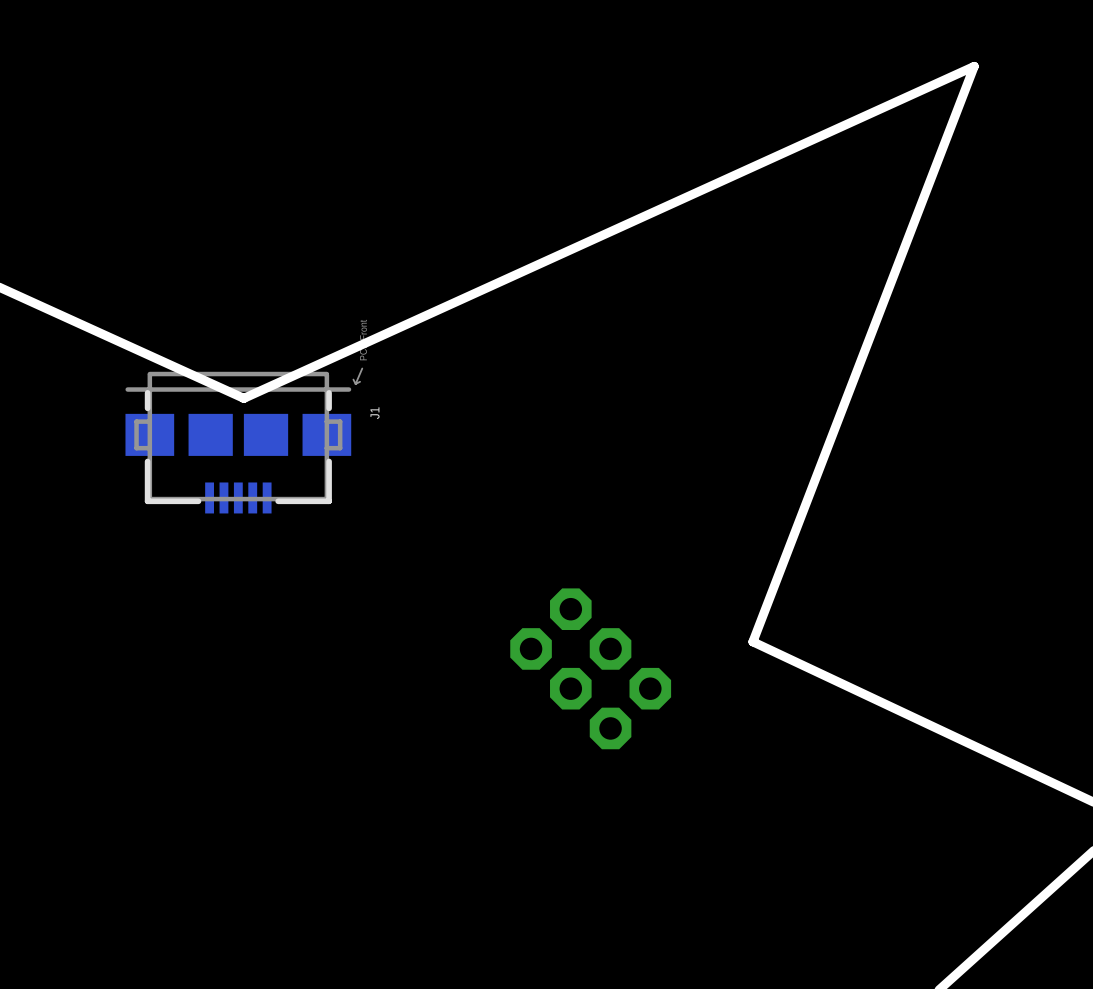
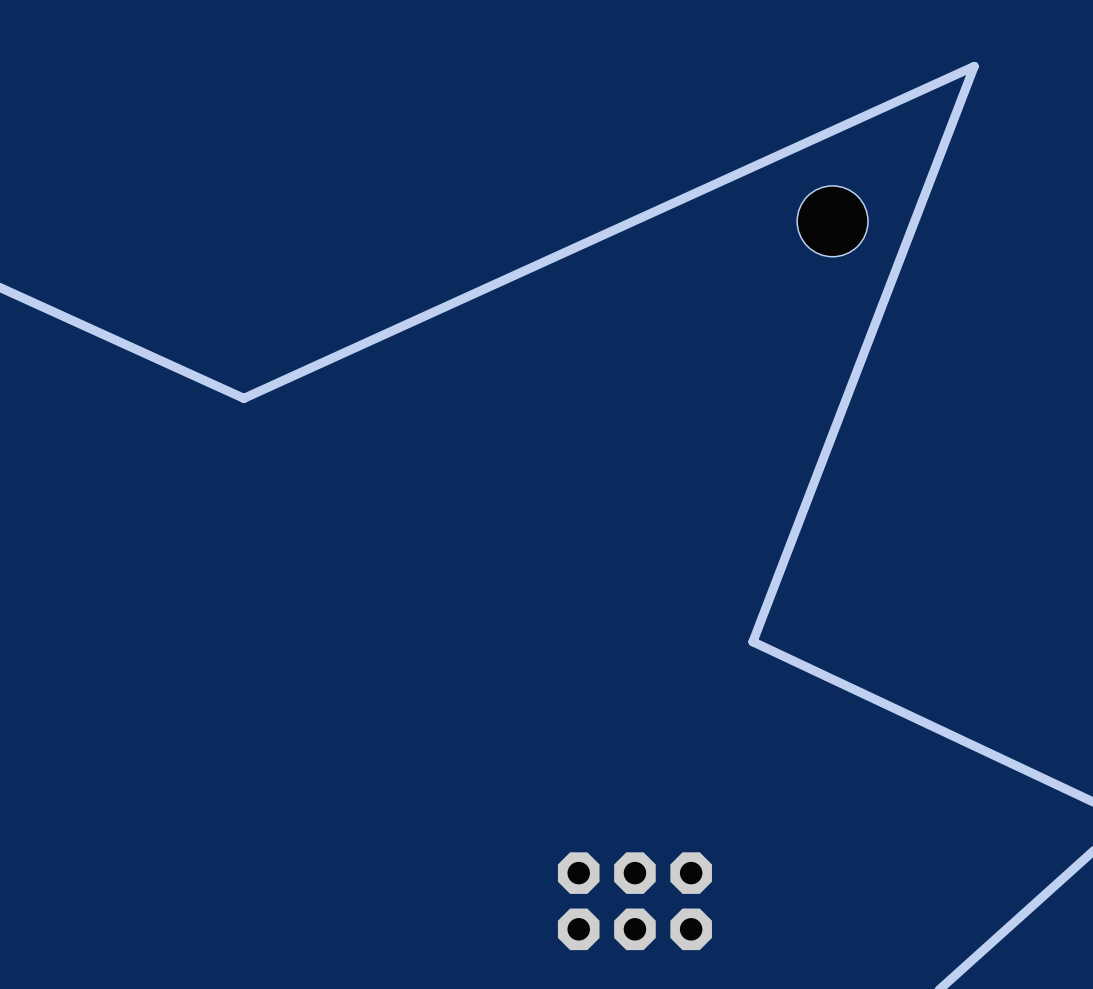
hole: none -> (832, 221)
J1: (244, 440) -> none
part: (590, 668) -> none
part: none -> (634, 901)

